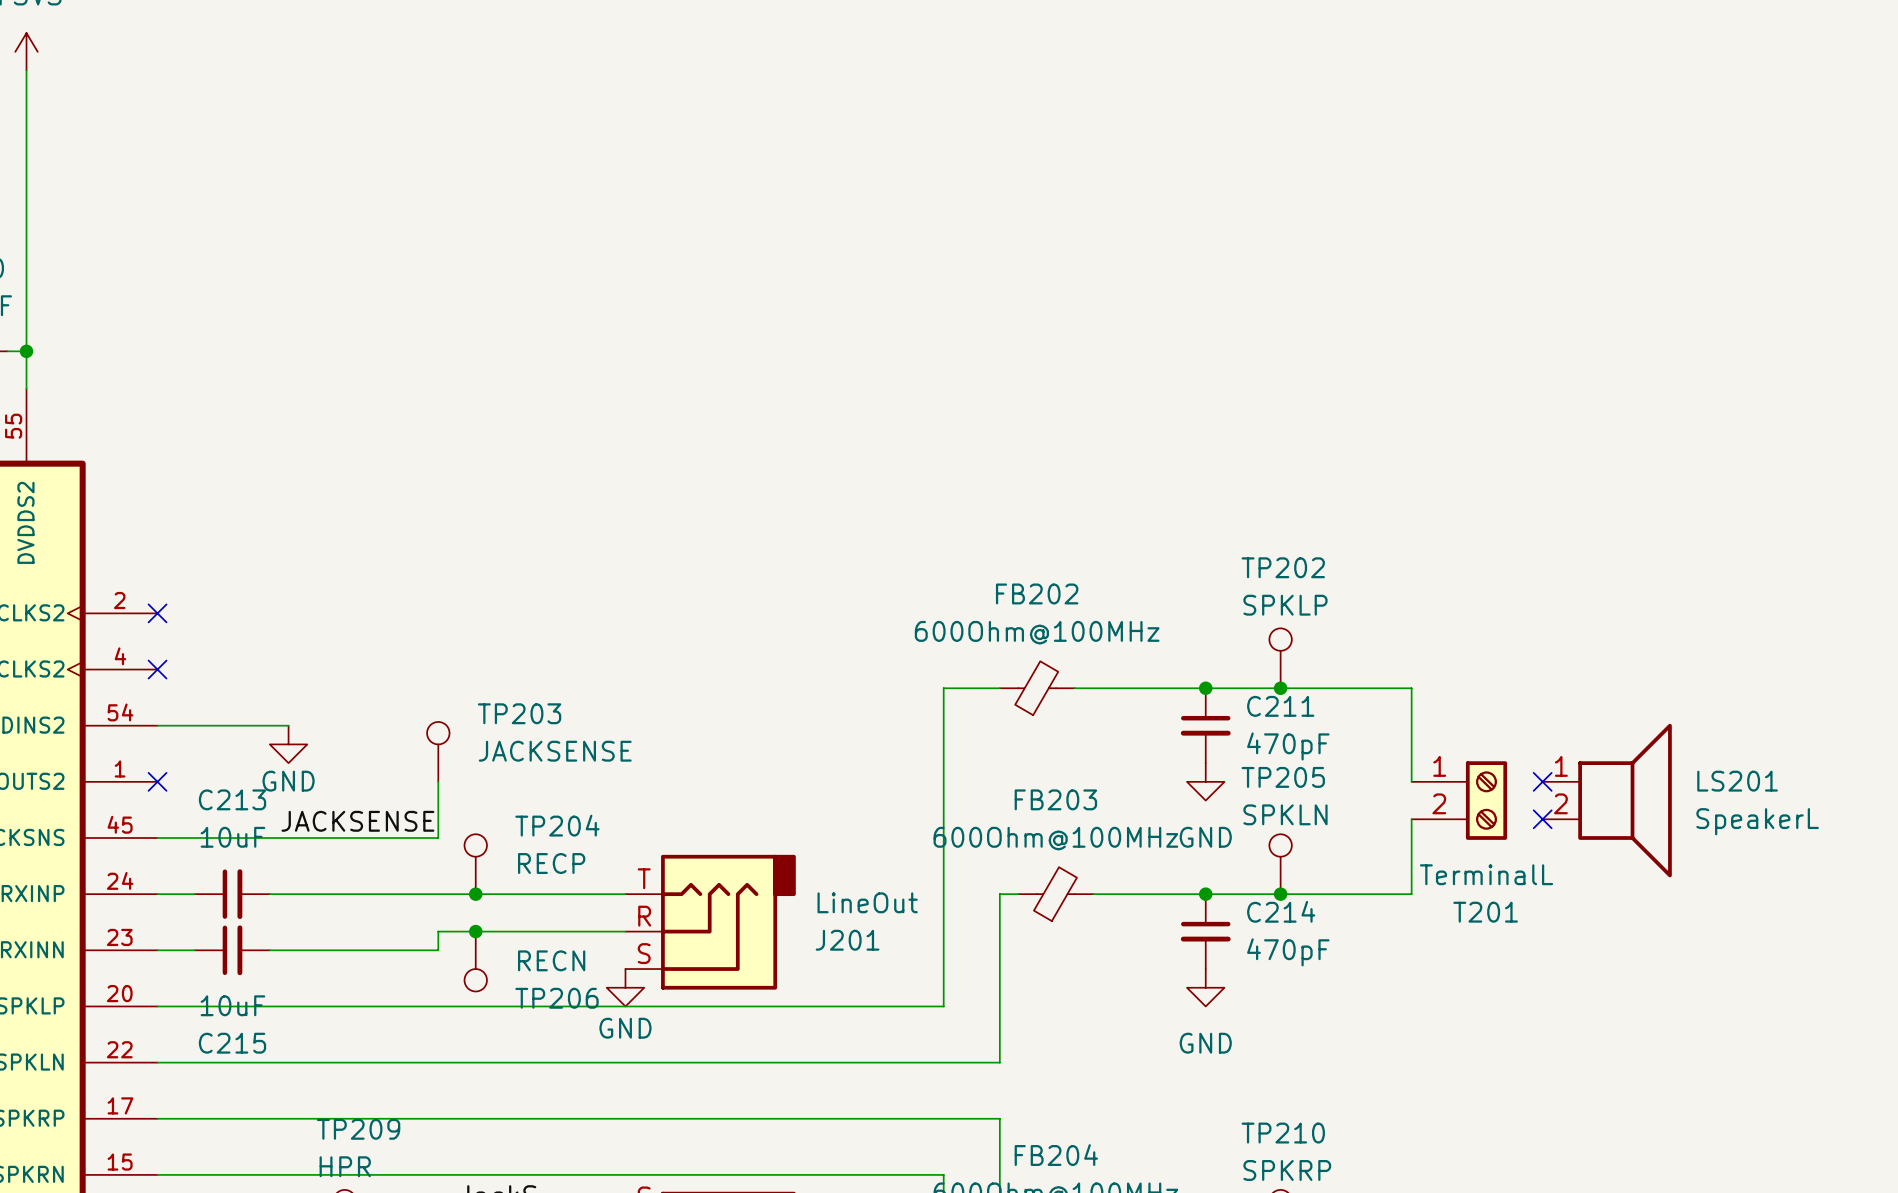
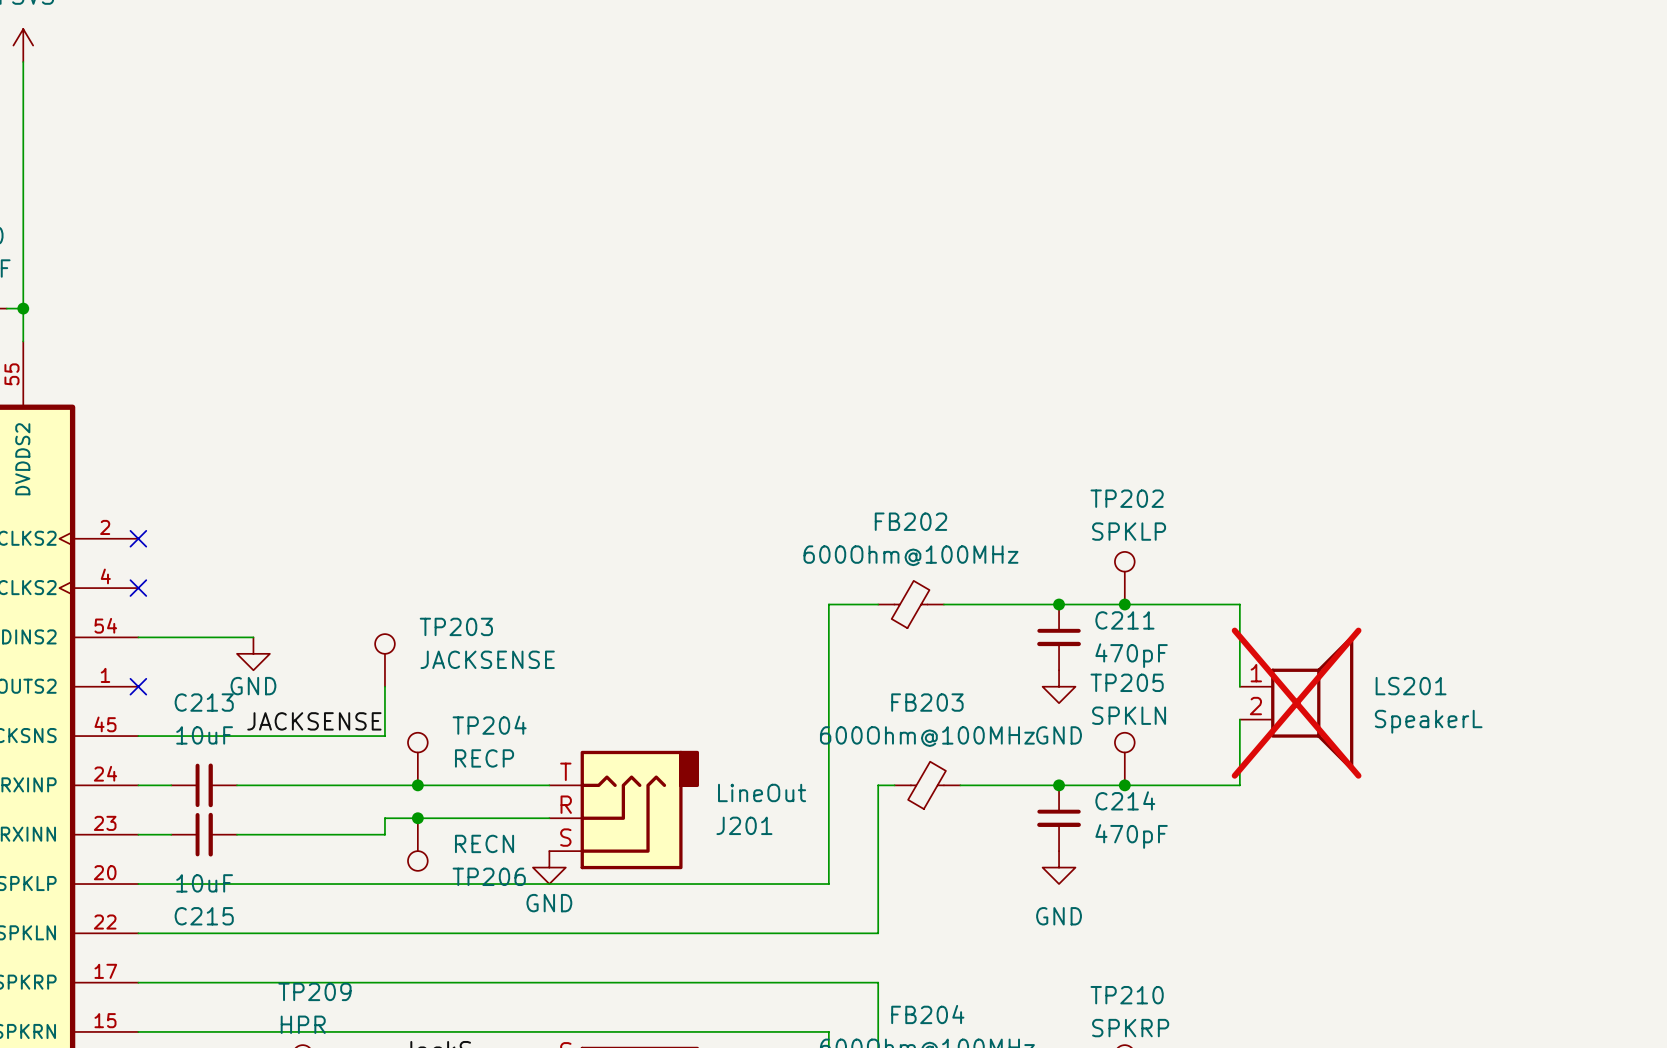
no-connect mark: (1542, 781) -> none
T201: TerminalL (1459, 800) -> none
LS201 do-not-place cross: none -> (1296, 703)
LS201 position: (1607, 800) -> (1296, 703)
no-connect mark: (1542, 819) -> none

